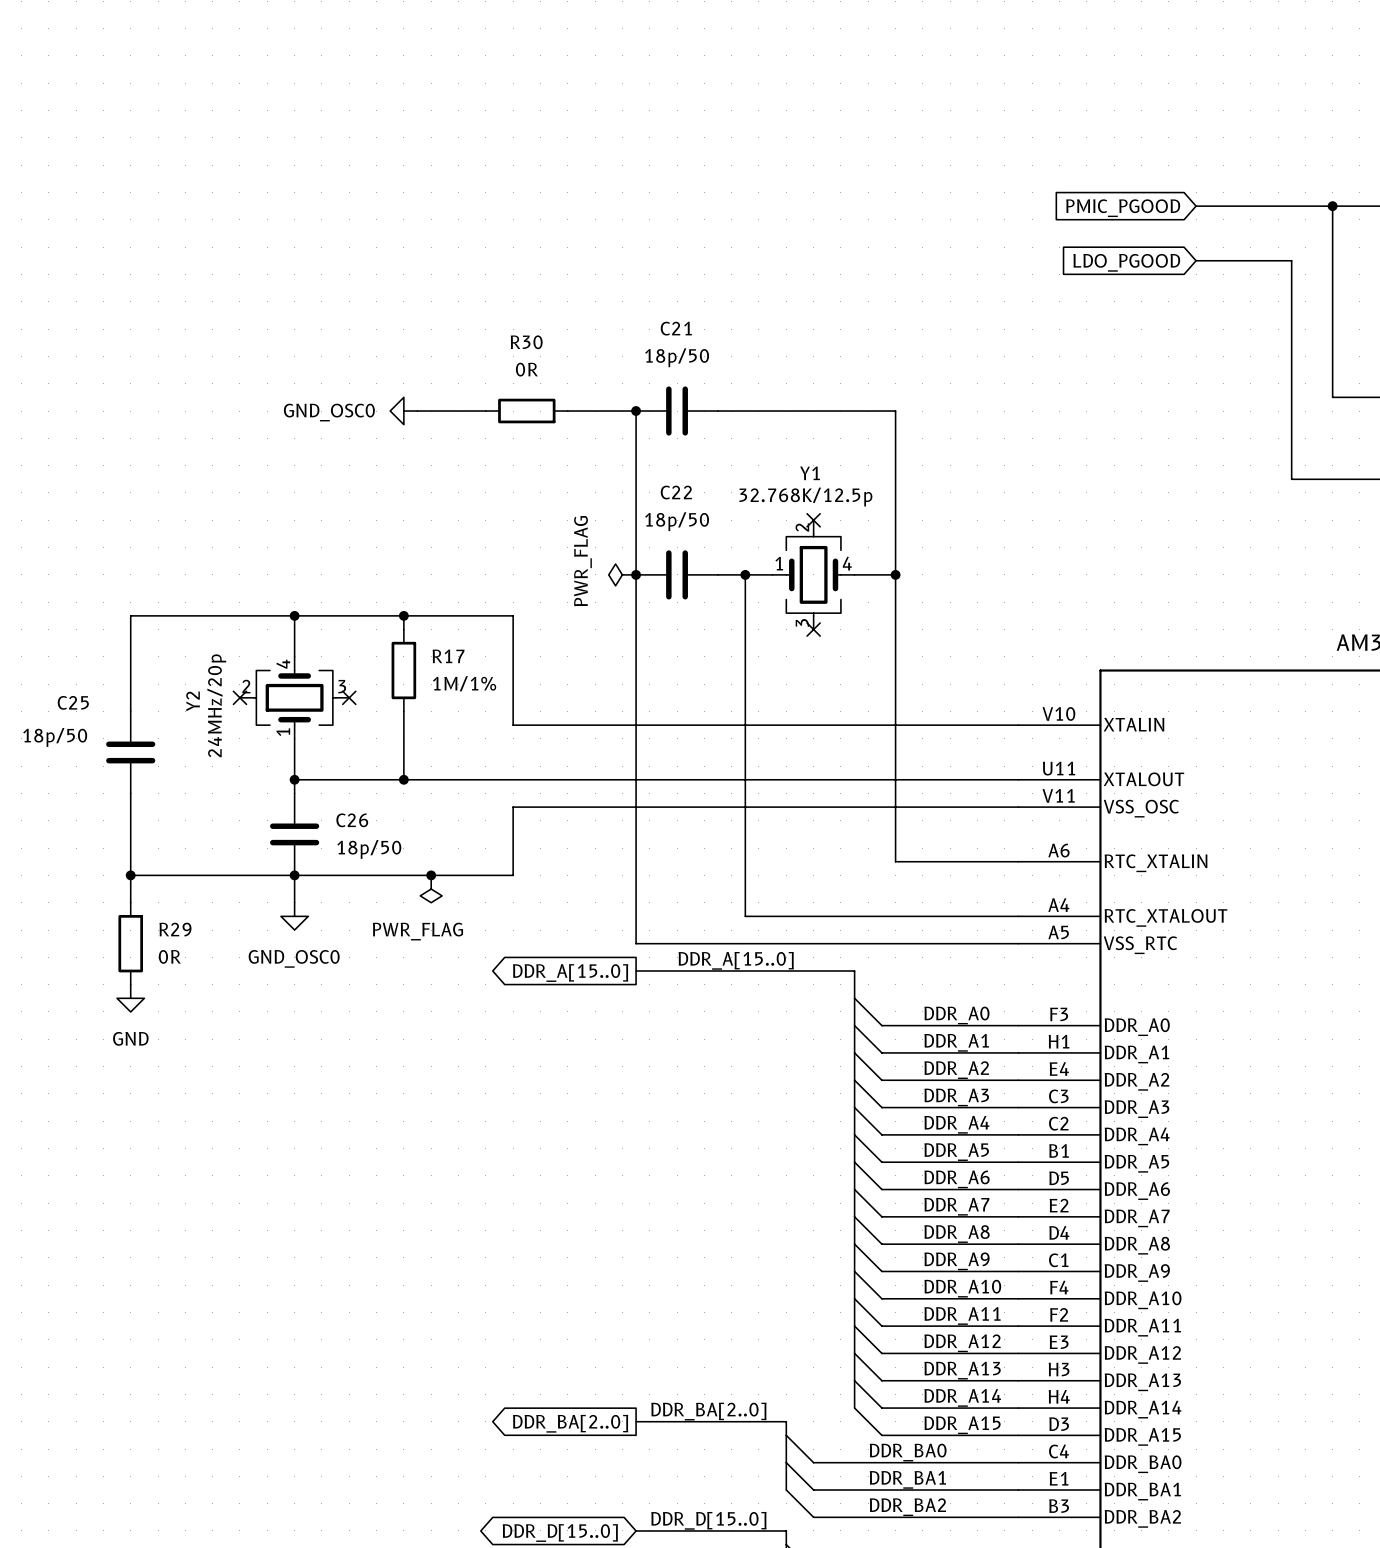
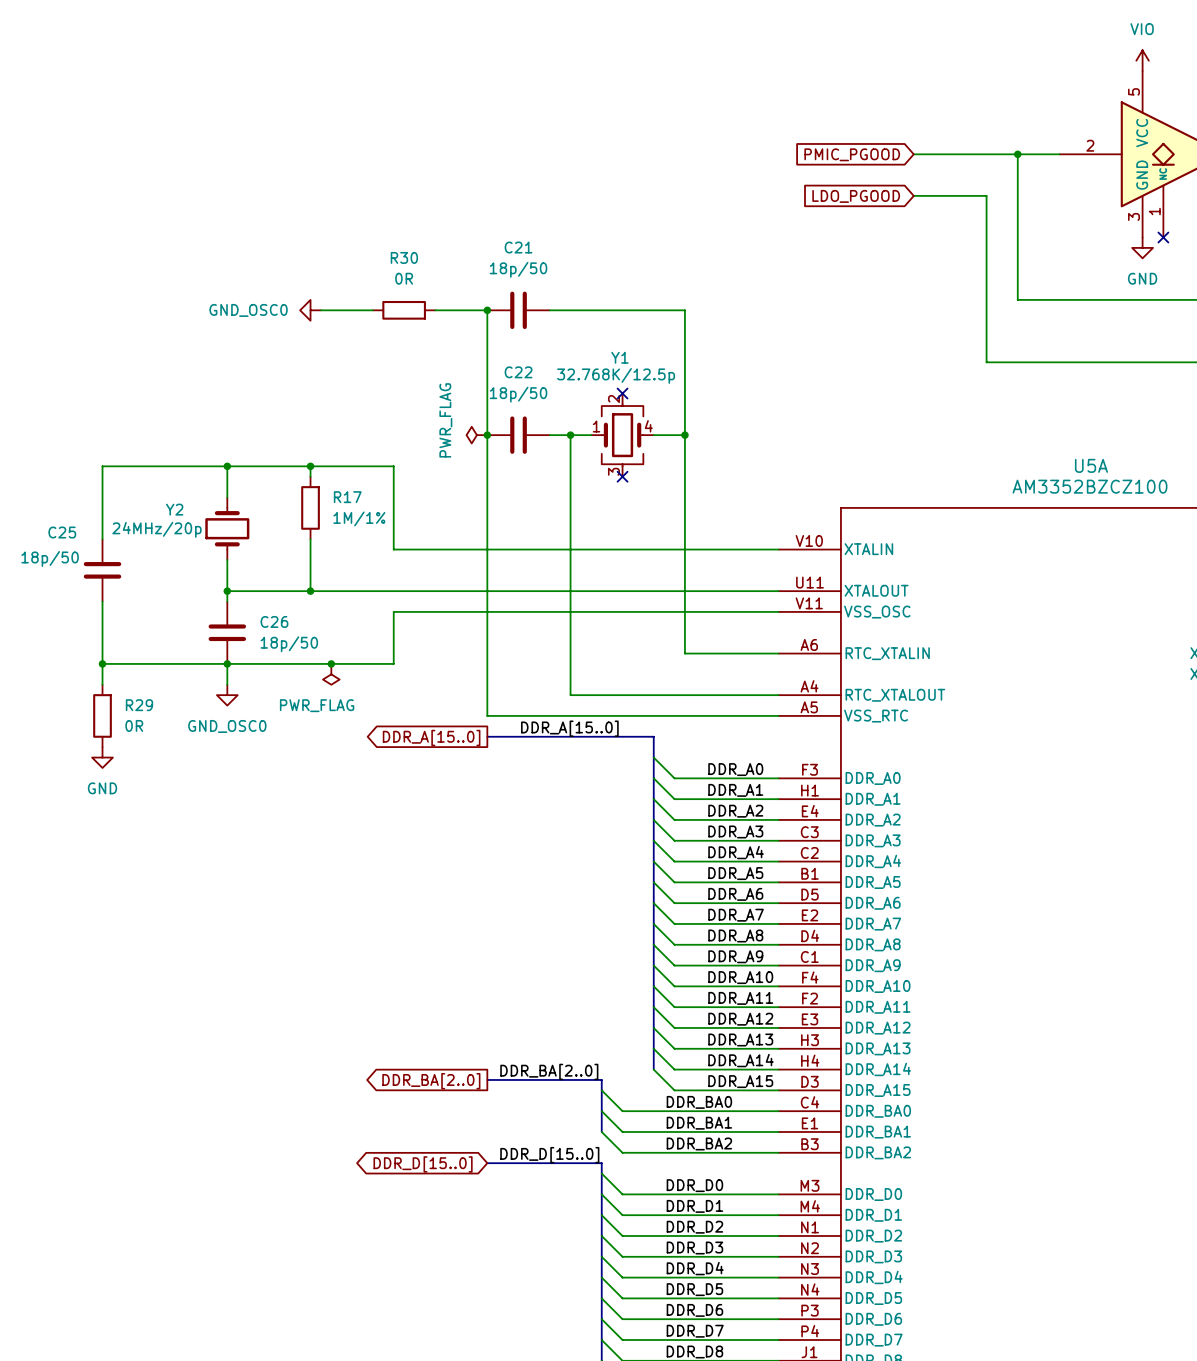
Y2 symbol: [239, 656, 350, 739] -> [205, 497, 250, 560]
no-connect mark: (239, 697) -> none
no-connect mark: (349, 697) -> none
Y2 name position: Y2 (193, 701) -> Y2 (174, 509)

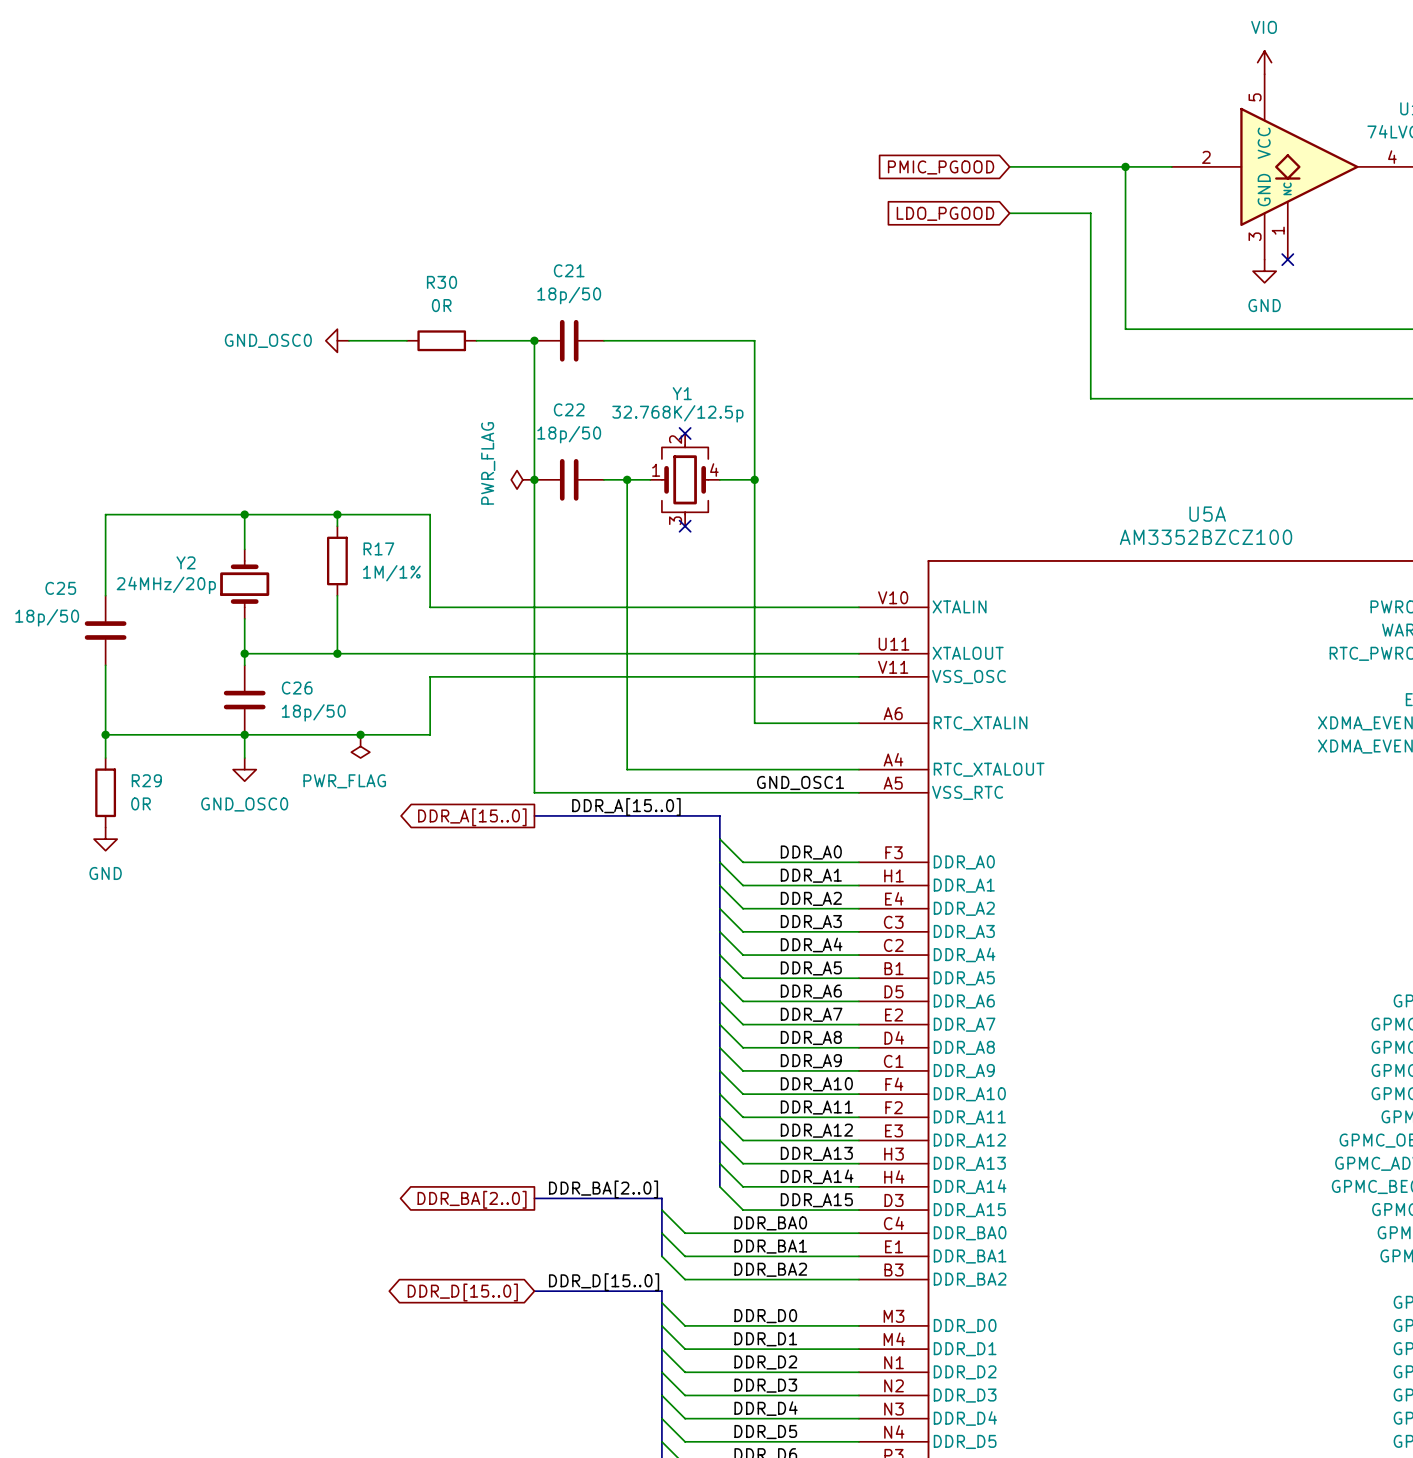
label: none -> GND_OSC1 (800, 782)

